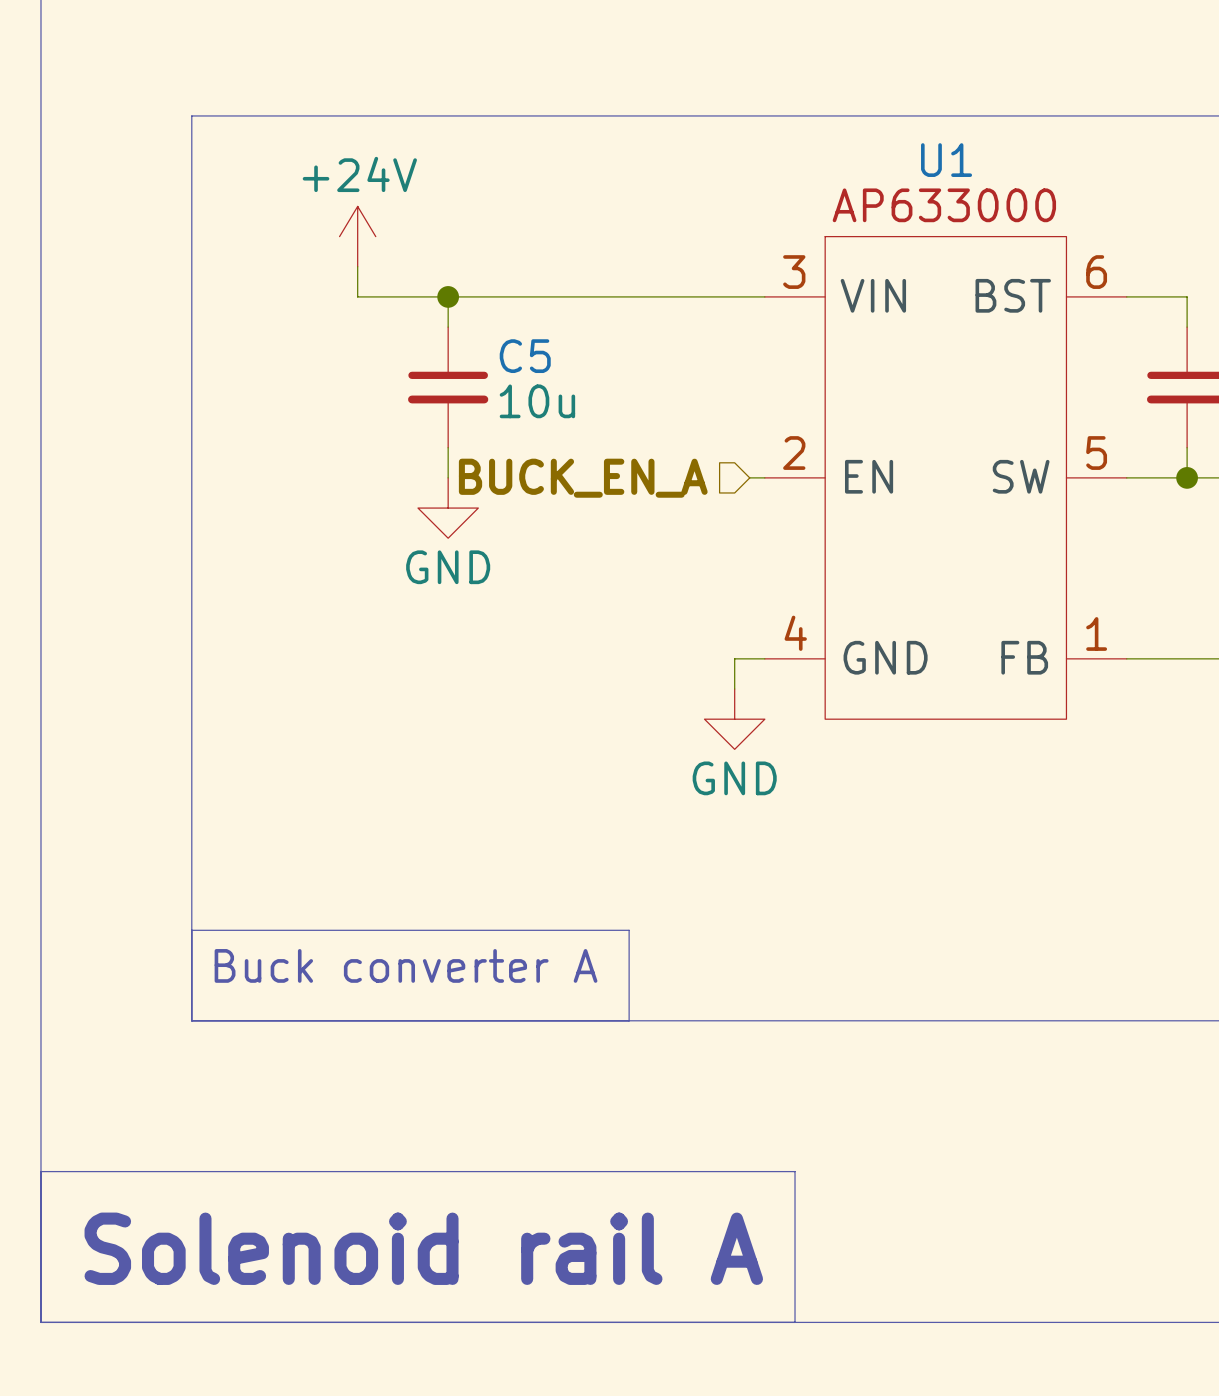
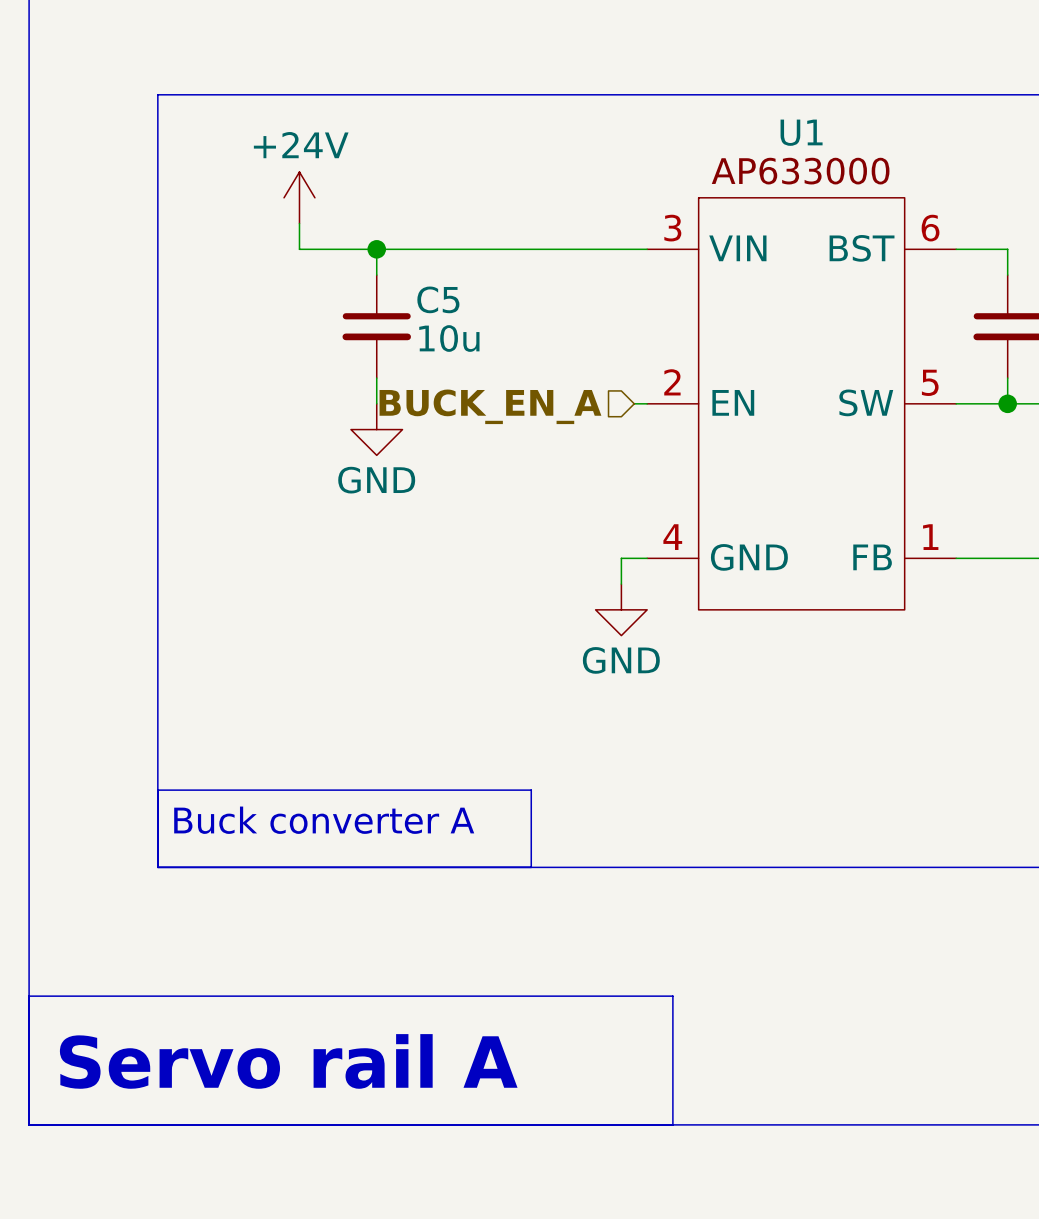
text: Solenoid rail A (423, 1248) -> Servo rail A (288, 1061)

